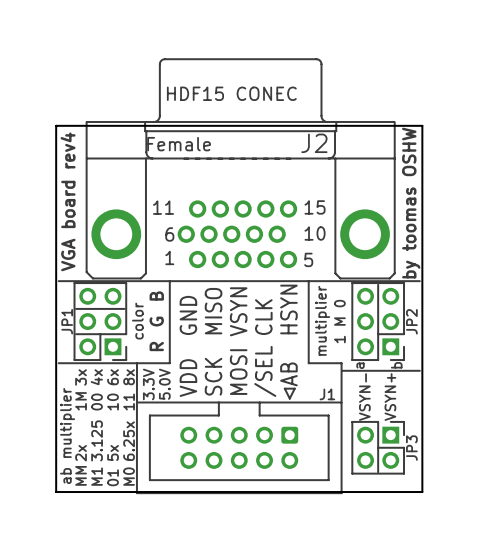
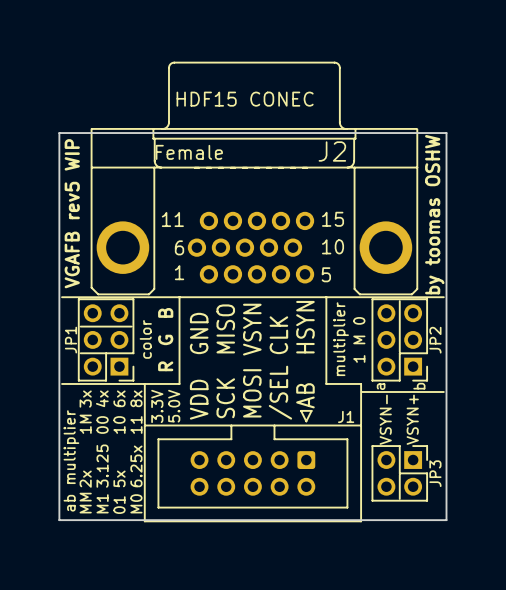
text: VGA board rev4 (68, 201) -> VGAFB rev5 WIP (72, 213)

